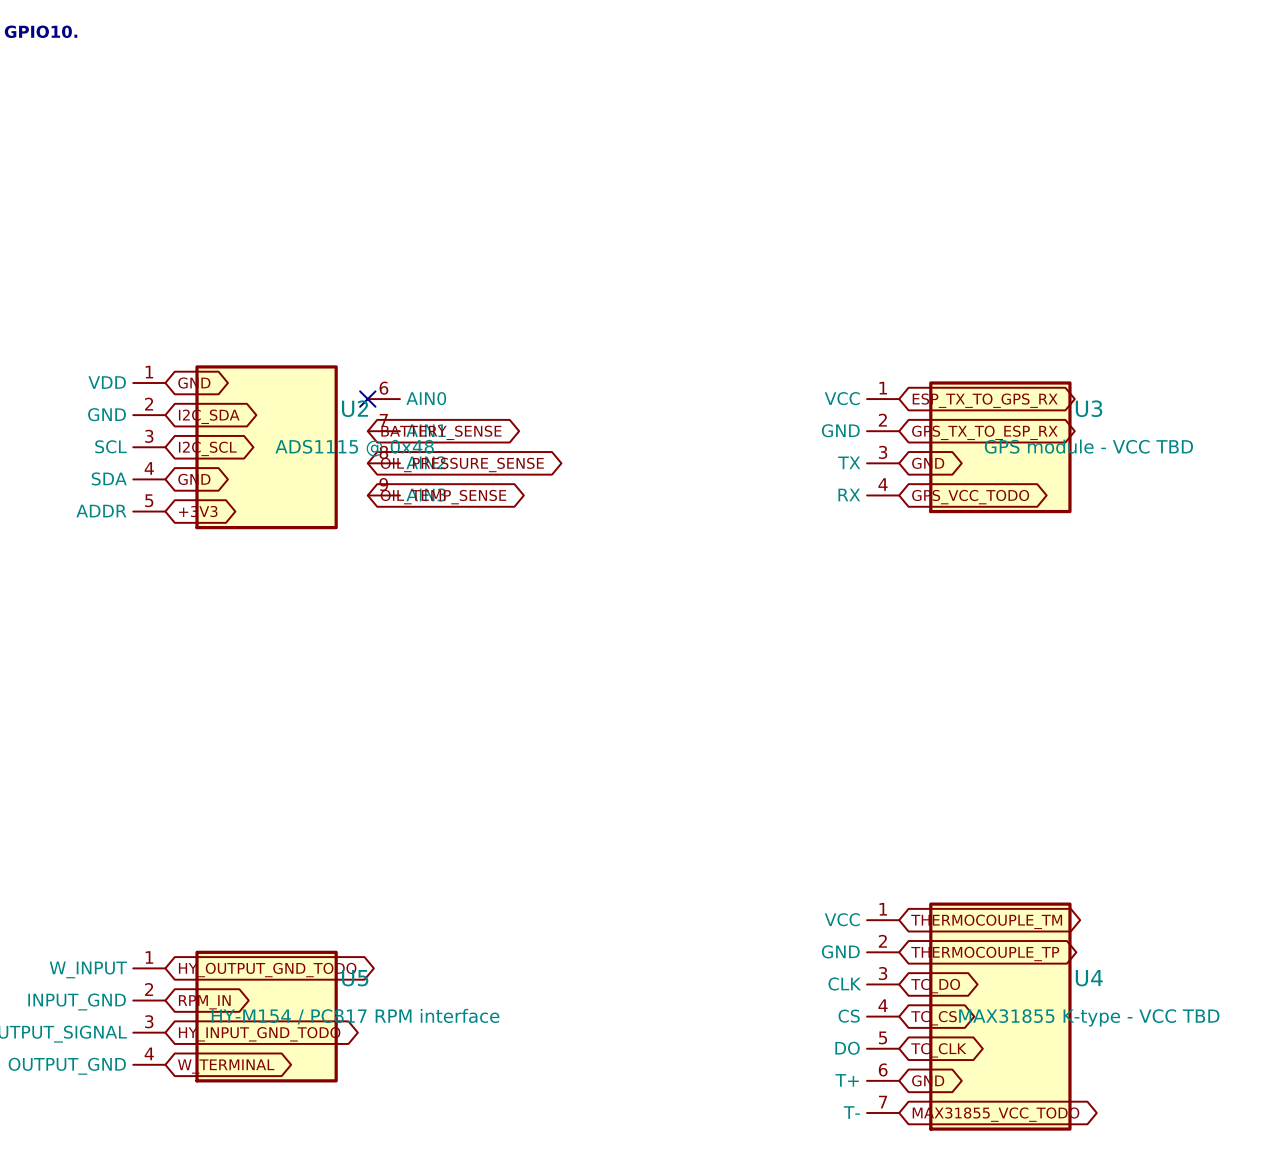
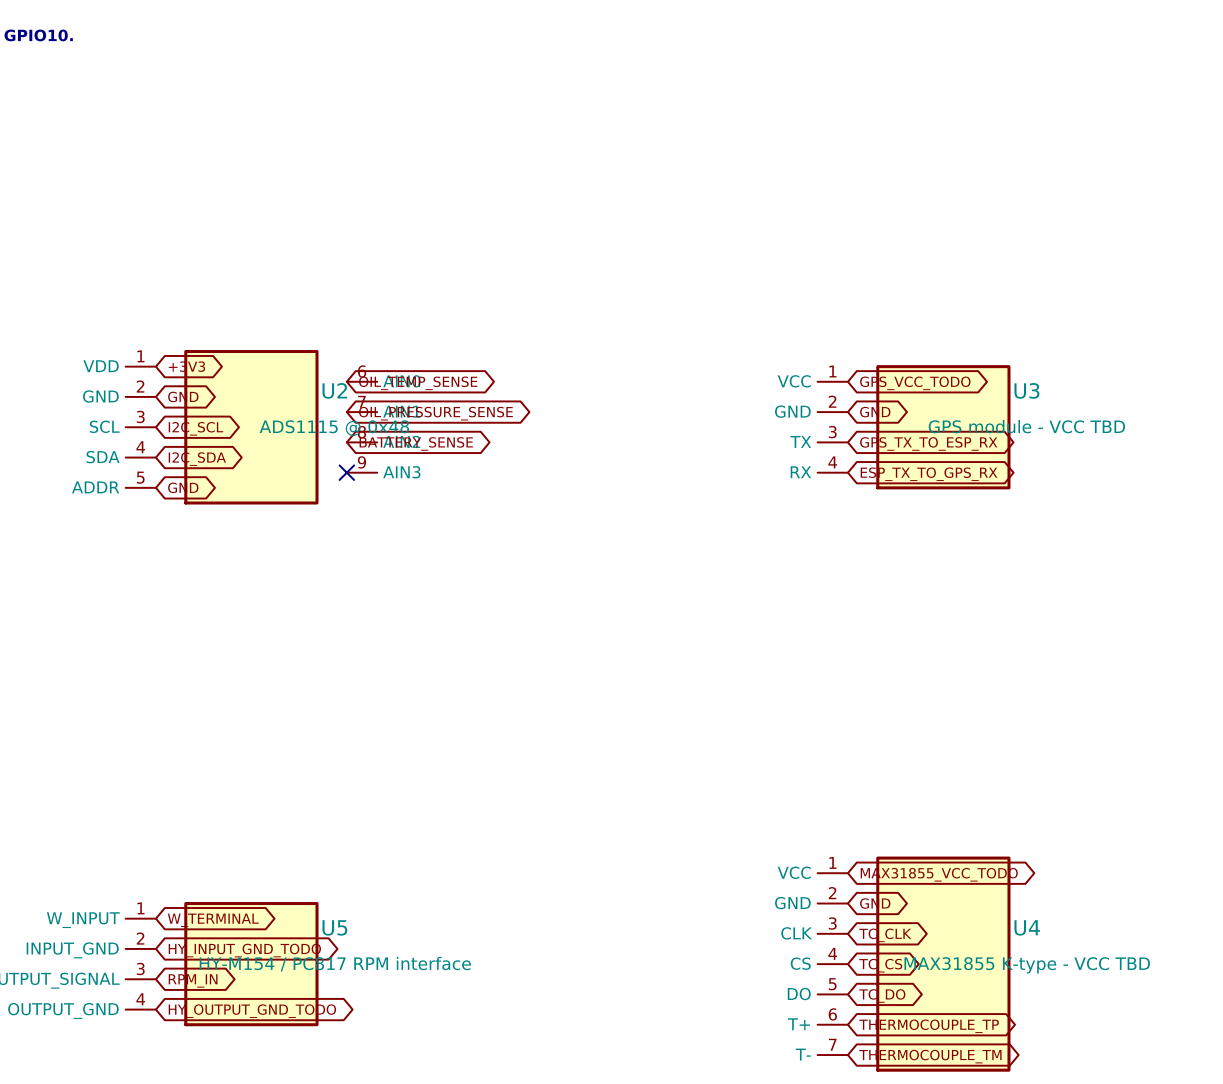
global label: GND (194, 383) -> +3V3 (186, 366)
no-connect mark: (367, 399) -> none
global label: ESP_TX_TO_GPS_RX (985, 400) -> GPS_VCC_TODO (915, 383)
global label: I2C_SDA (209, 416) -> GND (183, 396)
global label: BATTERY_SENSE (441, 432) -> OIL_PRESSURE_SENSE (435, 413)
global label: GPS_TX_TO_ESP_RX (984, 432) -> GND (875, 412)
global label: GND (928, 463) -> GPS_TX_TO_ESP_RX (928, 443)
global label: OIL_PRESSURE_SENSE (462, 464) -> BATTERY_SENSE (416, 443)
global label: GND (194, 479) -> I2C_SDA (197, 459)
no-connect mark: none -> (346, 472)
global label position: OIL_TEMP_SENSE (443, 497) -> OIL_TEMP_SENSE (418, 383)
global label: GPS_VCC_TODO (970, 497) -> ESP_TX_TO_GPS_RX (929, 474)
global label: +3V3 (198, 511) -> GND (183, 487)
global label: THERMOCOUPLE_TM (986, 921) -> MAX31855_VCC_TODO (939, 874)
global label: THERMOCOUPLE_TP (985, 953) -> GND (875, 903)
global label: HY_OUTPUT_GND_TODO (267, 970) -> W_TERMINAL (213, 920)
global label: TC_DO (935, 986) -> TC_CLK (885, 935)
global label: RPM_IN (204, 1002) -> HY_INPUT_GND_TODO (244, 950)
global label: HY_INPUT_GND_TODO (259, 1034) -> RPM_IN (193, 980)
global label: TC_CLK (938, 1050) -> TC_DO (882, 995)
global label: W_TERMINAL (226, 1066) -> HY_OUTPUT_GND_TODO (252, 1011)
global label: GND (928, 1080) -> THERMOCOUPLE_TP (929, 1026)
global label: MAX31855_VCC_TODO (996, 1114) -> THERMOCOUPLE_TM (930, 1056)

